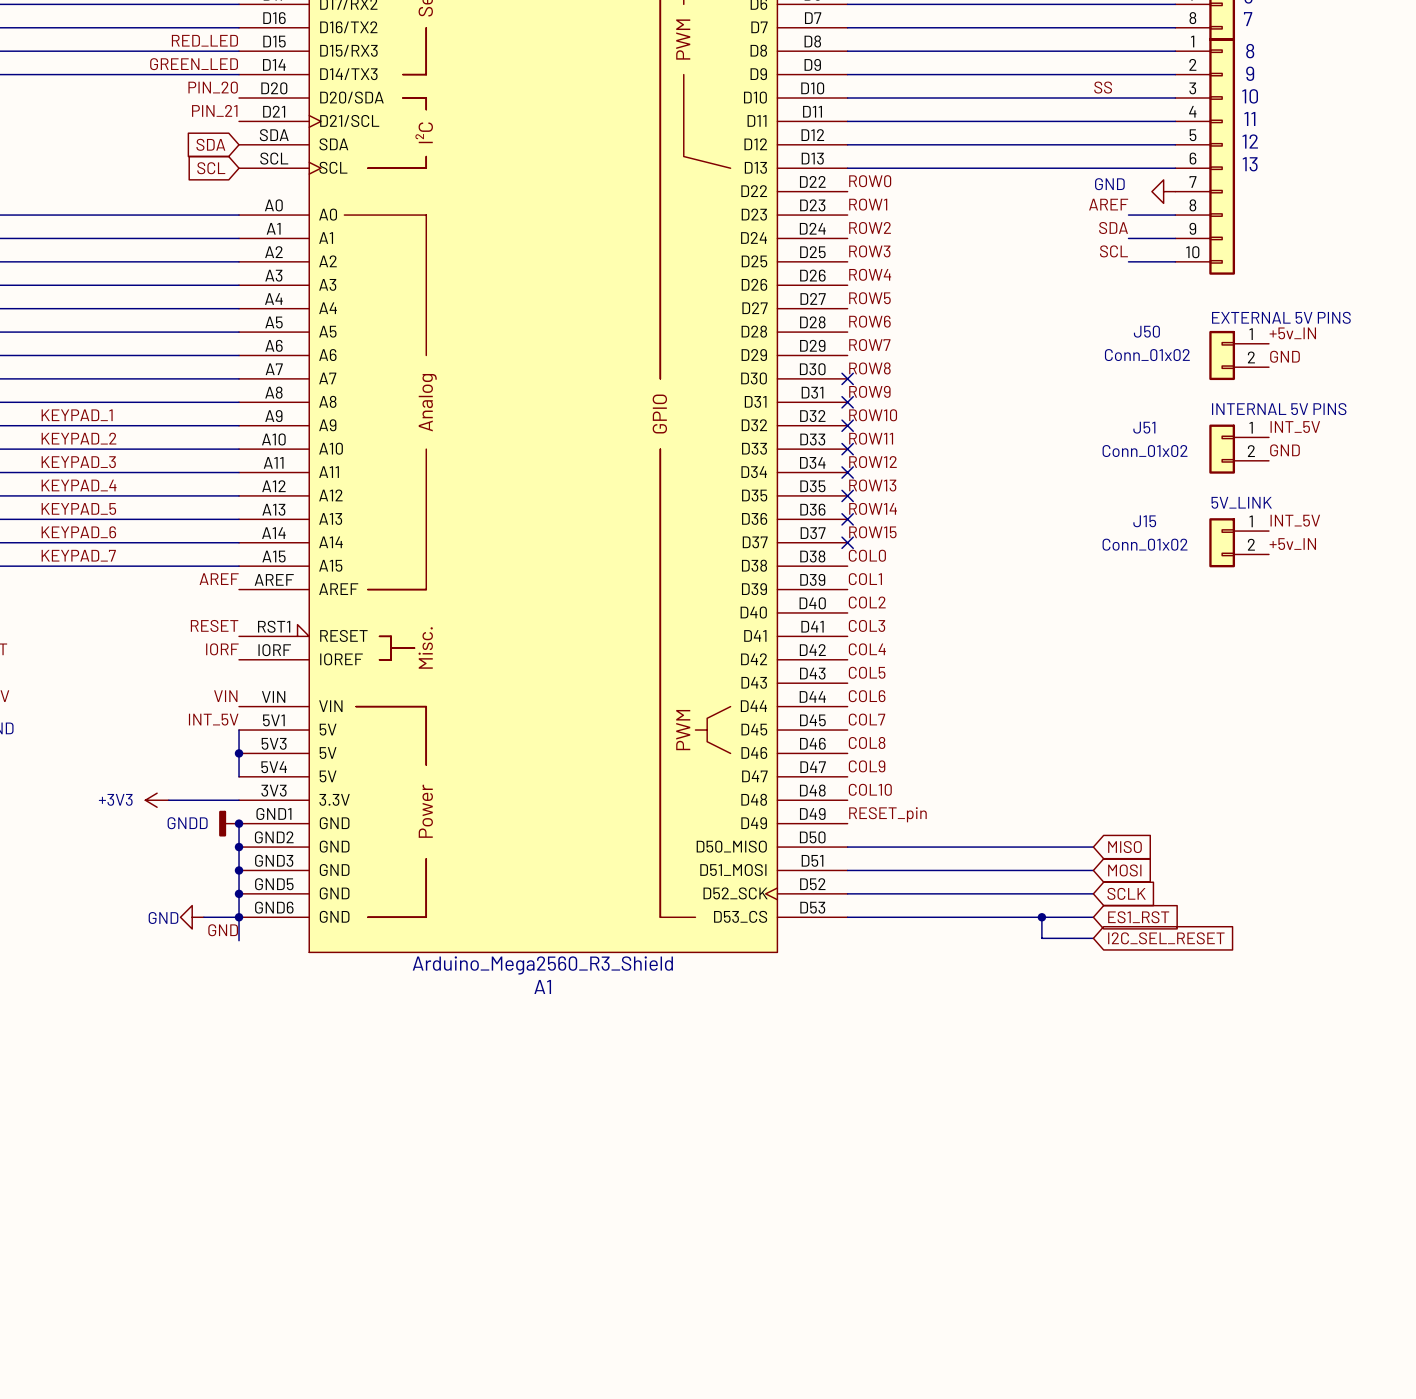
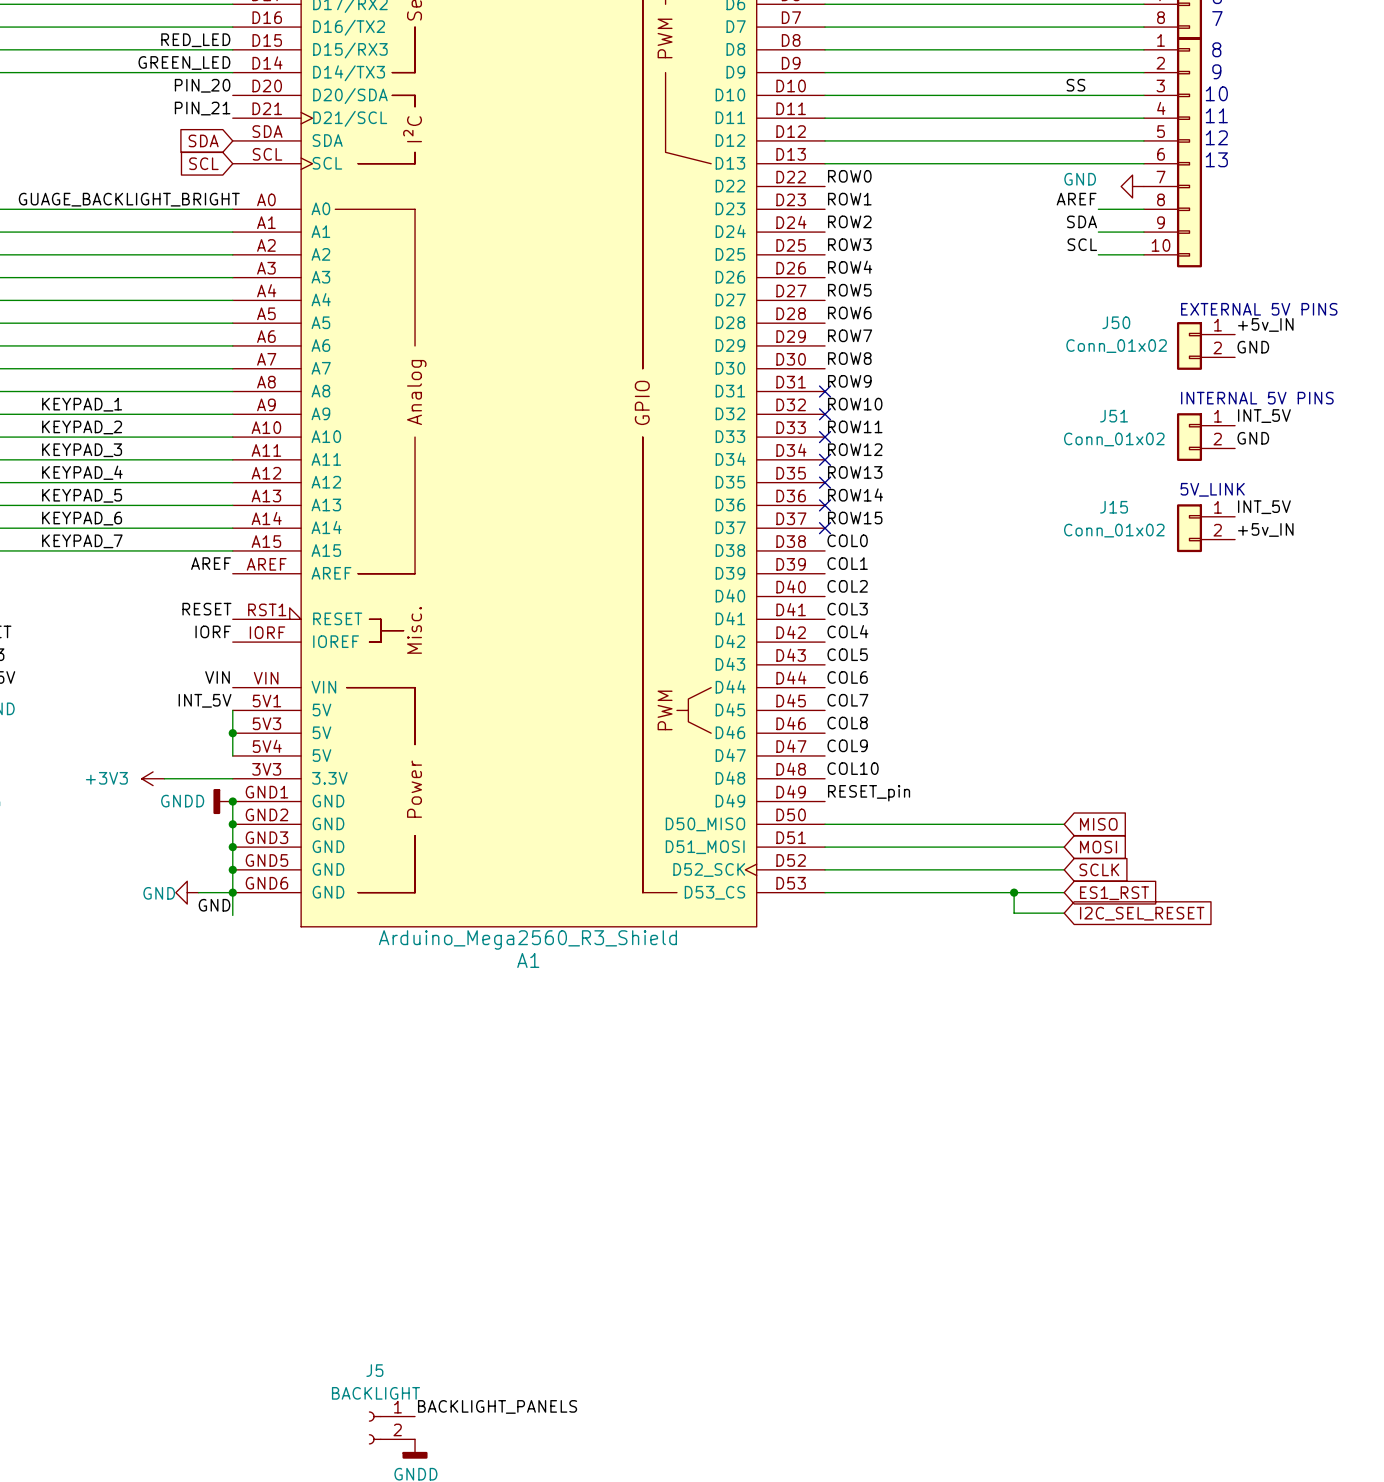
label: none -> GUAGE_BACKLIGHT_BRIGHT (129, 199)
no-connect mark: (847, 378) -> none

